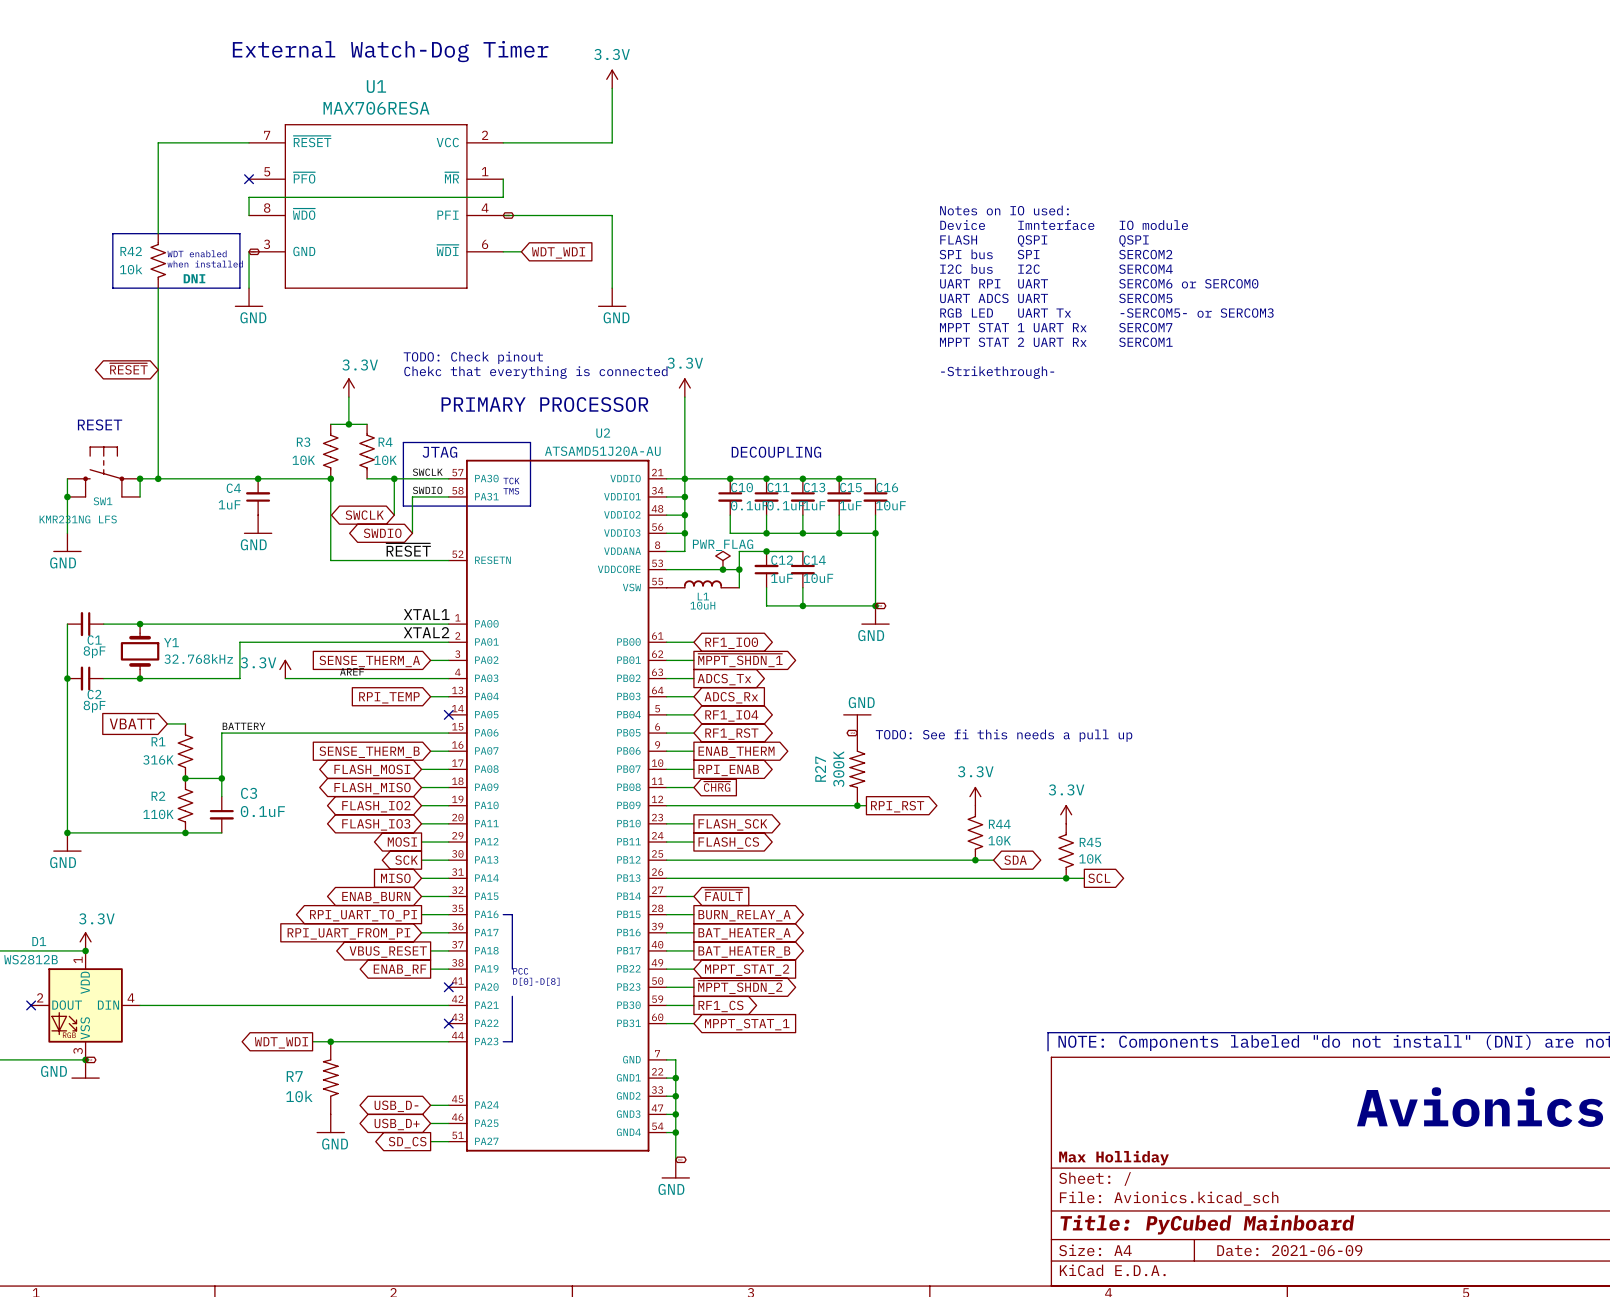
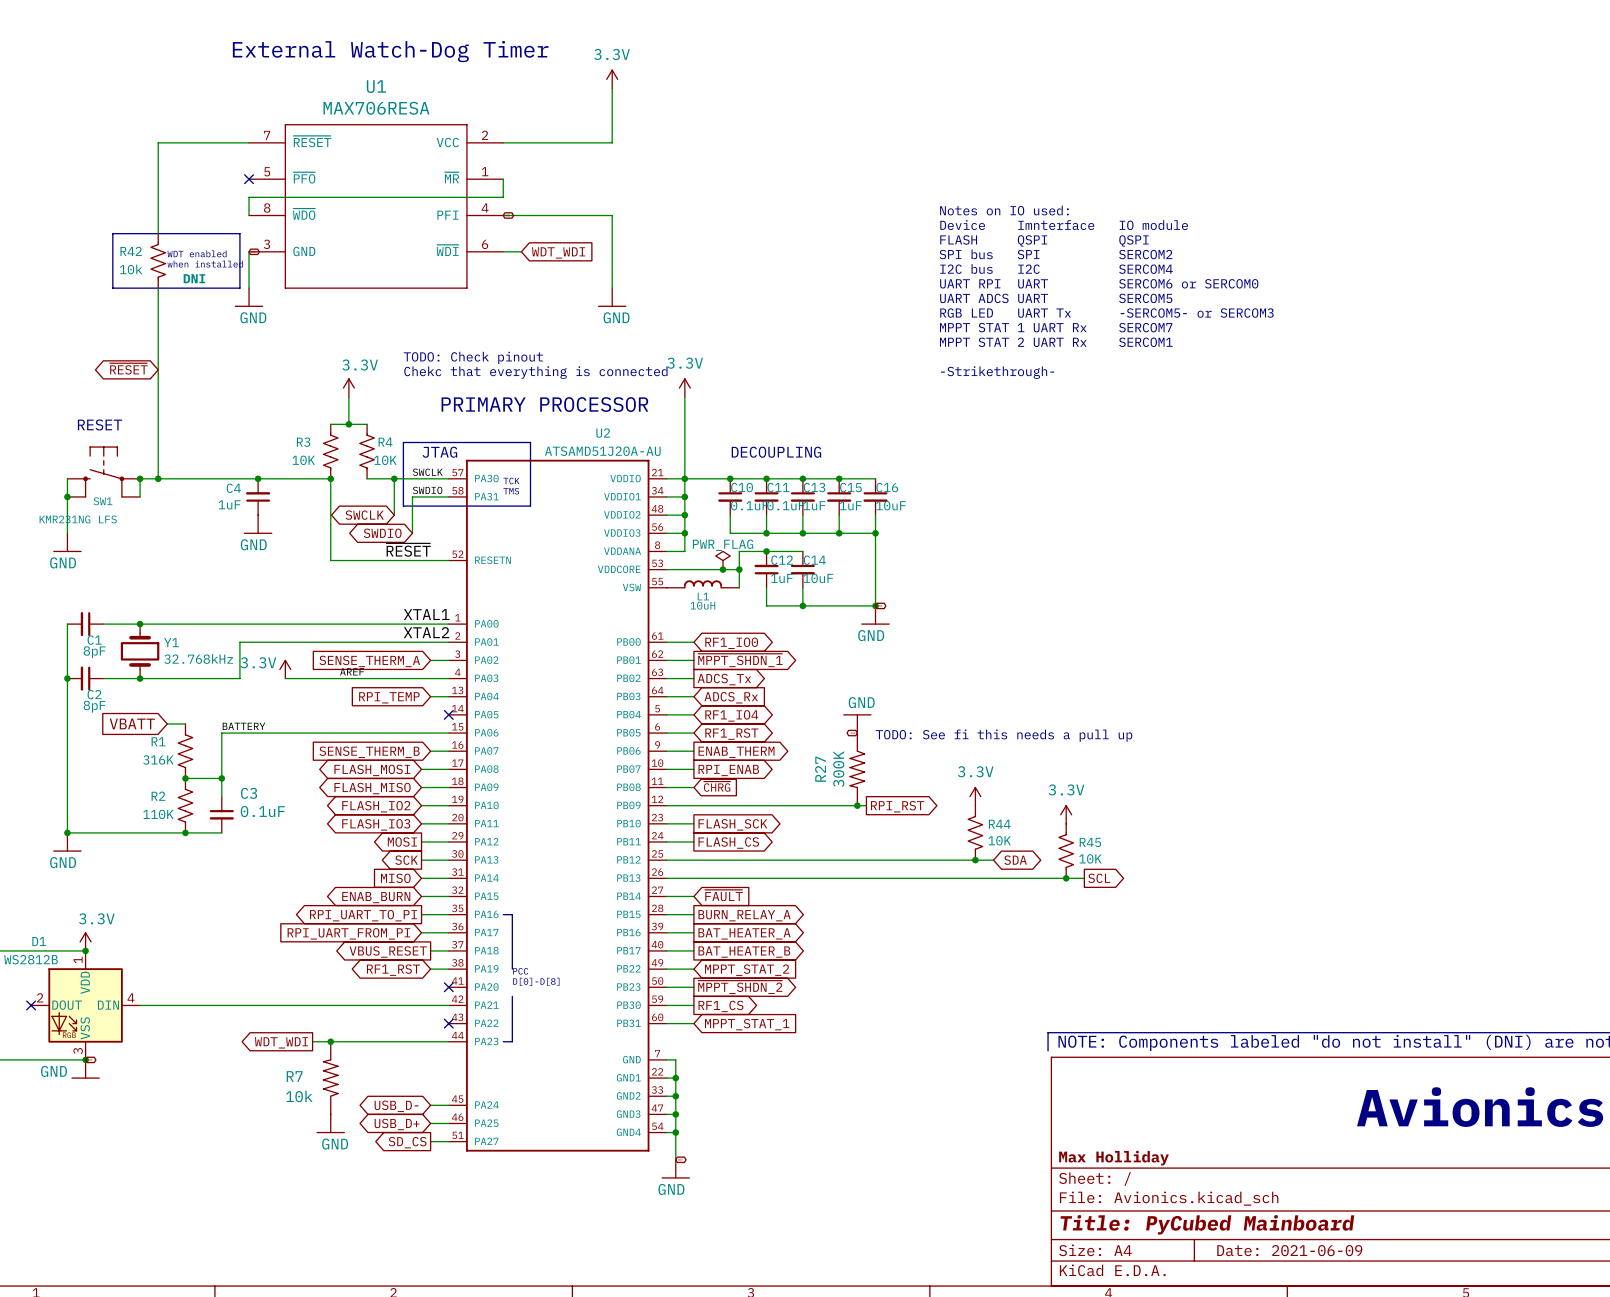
global label shape: output (400, 970) -> bidirectional (393, 970)
global label: ENAB_RF (400, 970) -> RF1_RST (393, 970)

